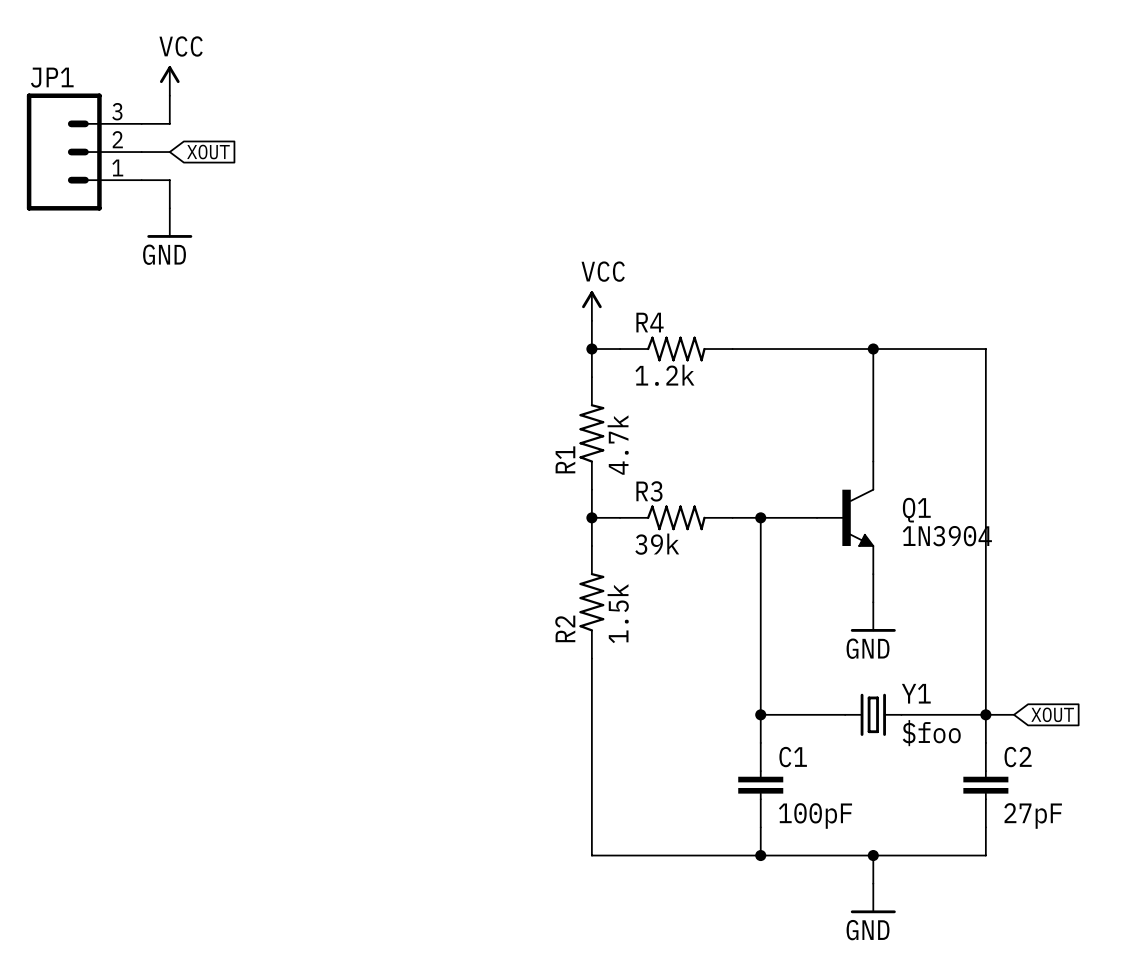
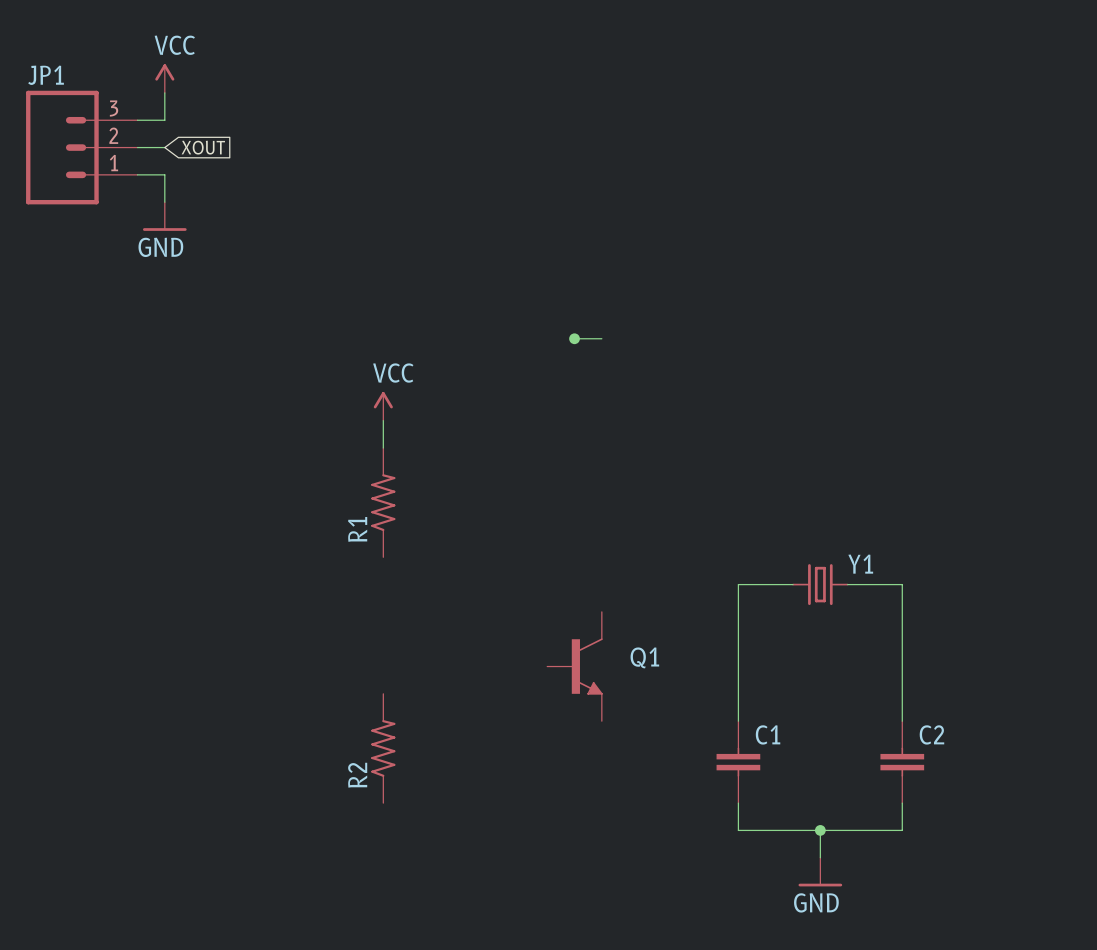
power symbol position: VCC (591, 306) -> VCC (383, 406)
wire: (591, 320) (591, 377) -> none
R4: 1.2k (676, 349) -> none
wire: (732, 349) (985, 349) (985, 742) -> none
wire: (873, 349) (873, 461) -> none
junction: (873, 349) -> none
wire: none -> (383, 420) (383, 448)
R1 position: (591, 433) -> (383, 502)
R1 value: 4.7k (618, 445) -> none
wire: (591, 489) (591, 545) -> none
wire: (591, 517) (620, 517) -> none
junction: (591, 517) -> none
R3: 39k (676, 517) -> none
wire: (732, 517) (817, 517) -> none
wire: (760, 517) (760, 602) -> (793, 584) (738, 584)
junction: (760, 517) -> none
Q1 position: (845, 517) -> (574, 666)
Q1 value: 1N3904 (947, 536) -> none
wire: (873, 574) (873, 602) -> (902, 721) (902, 584) (847, 584)
R2 position: (591, 602) -> (383, 748)
R2 value: 1.5k (618, 613) -> none
power symbol: GND (873, 617) -> none
wire: (591, 658) (591, 855) (760, 855) -> none
wire: (760, 714) (845, 714) -> none
junction: (760, 714) -> none
Y1 position: (873, 714) -> (820, 584)
wire: (901, 714) (1014, 714) -> none
junction: (985, 714) -> none
global label: XOUT (1052, 714) -> none
Y1 value: $foo (931, 733) -> none
C2 position: (985, 785) -> (902, 762)
C1 value: 100pF (815, 815) -> none
C2 value: 27pF (1033, 815) -> none
wire: (985, 827) (985, 855) (929, 855) -> (902, 803) (902, 830)
junction: (760, 855) -> none
wire: (873, 855) (873, 883) -> (820, 830) (820, 857)
junction position: (873, 855) -> (820, 830)
power symbol position: GND (873, 898) -> GND (820, 872)

